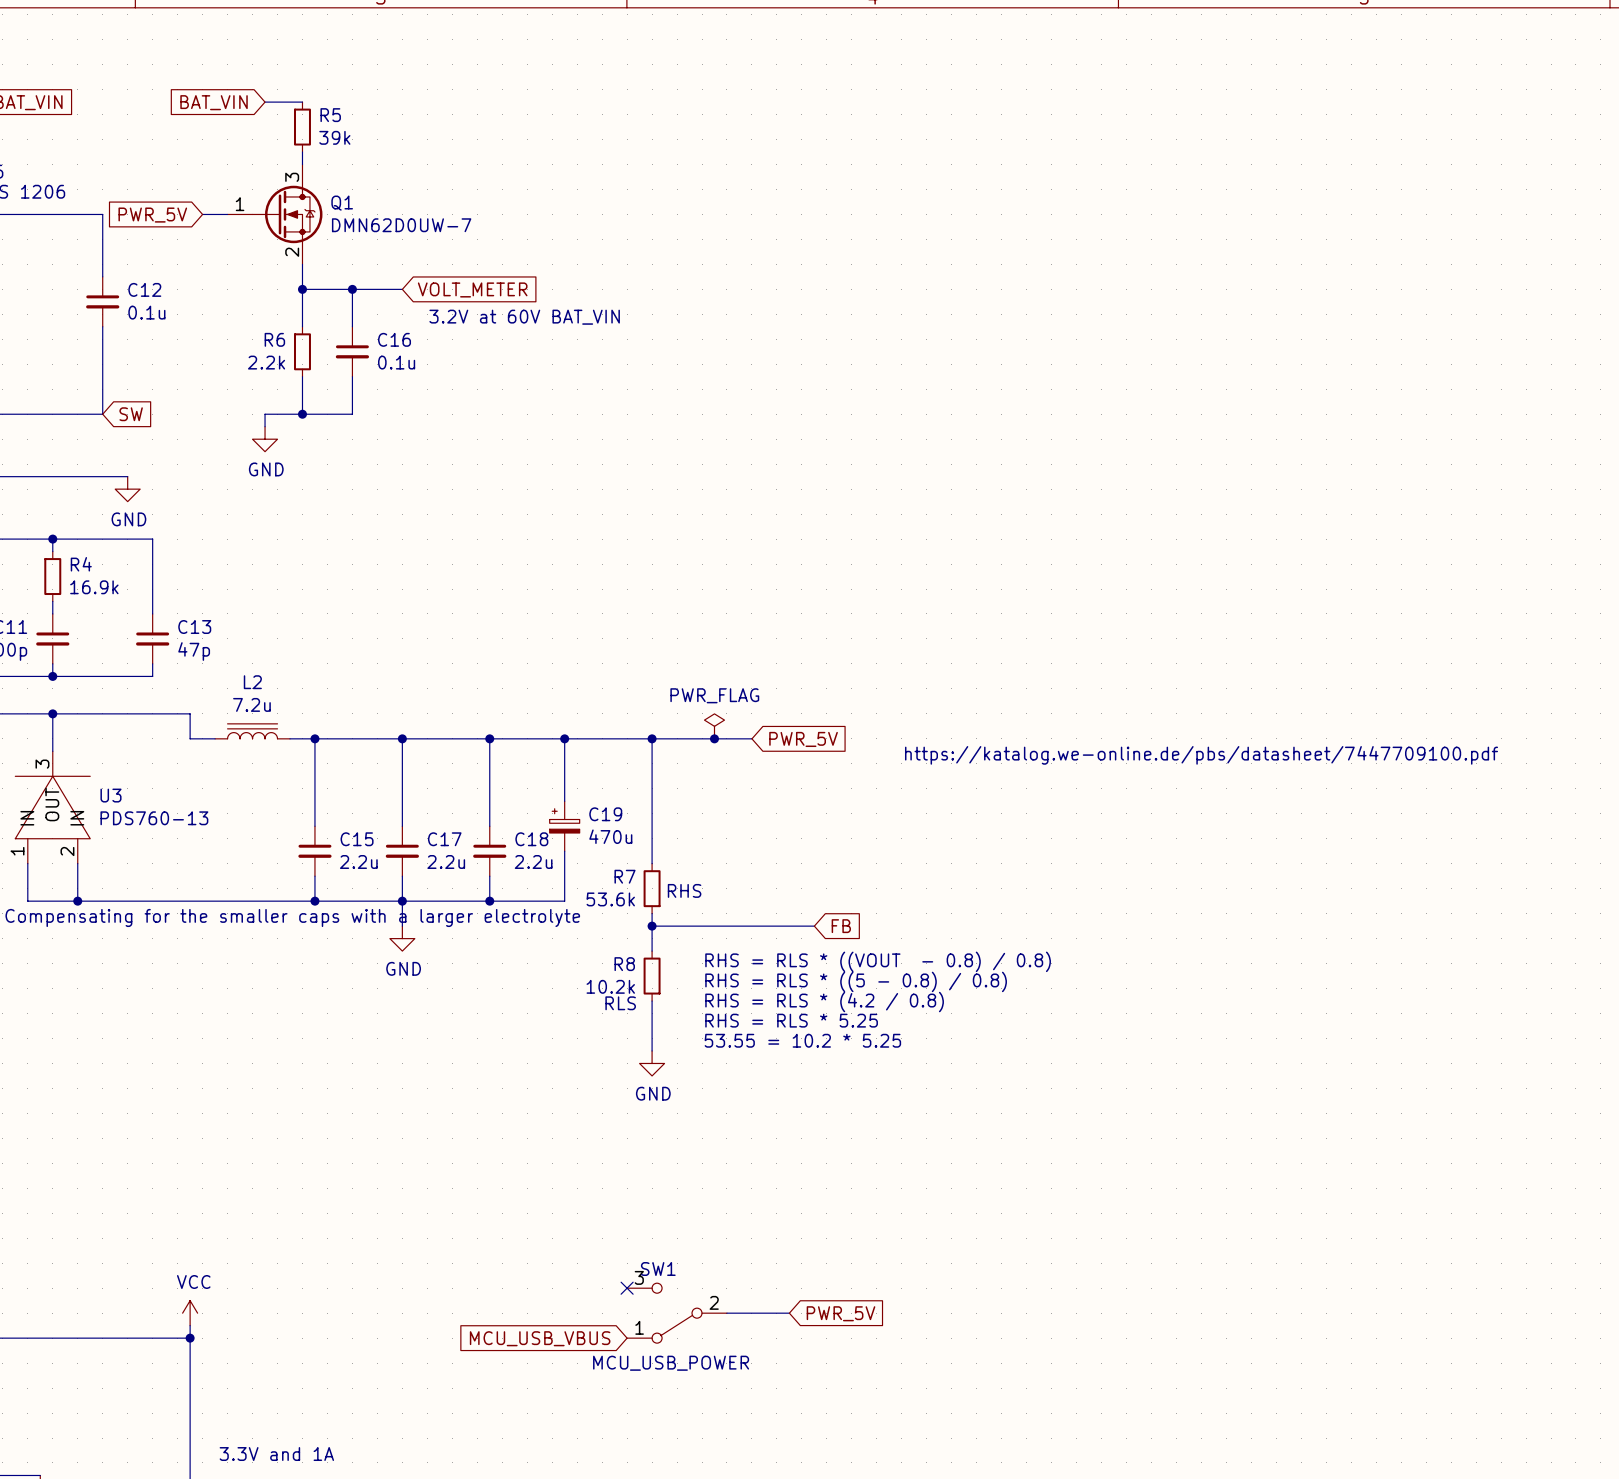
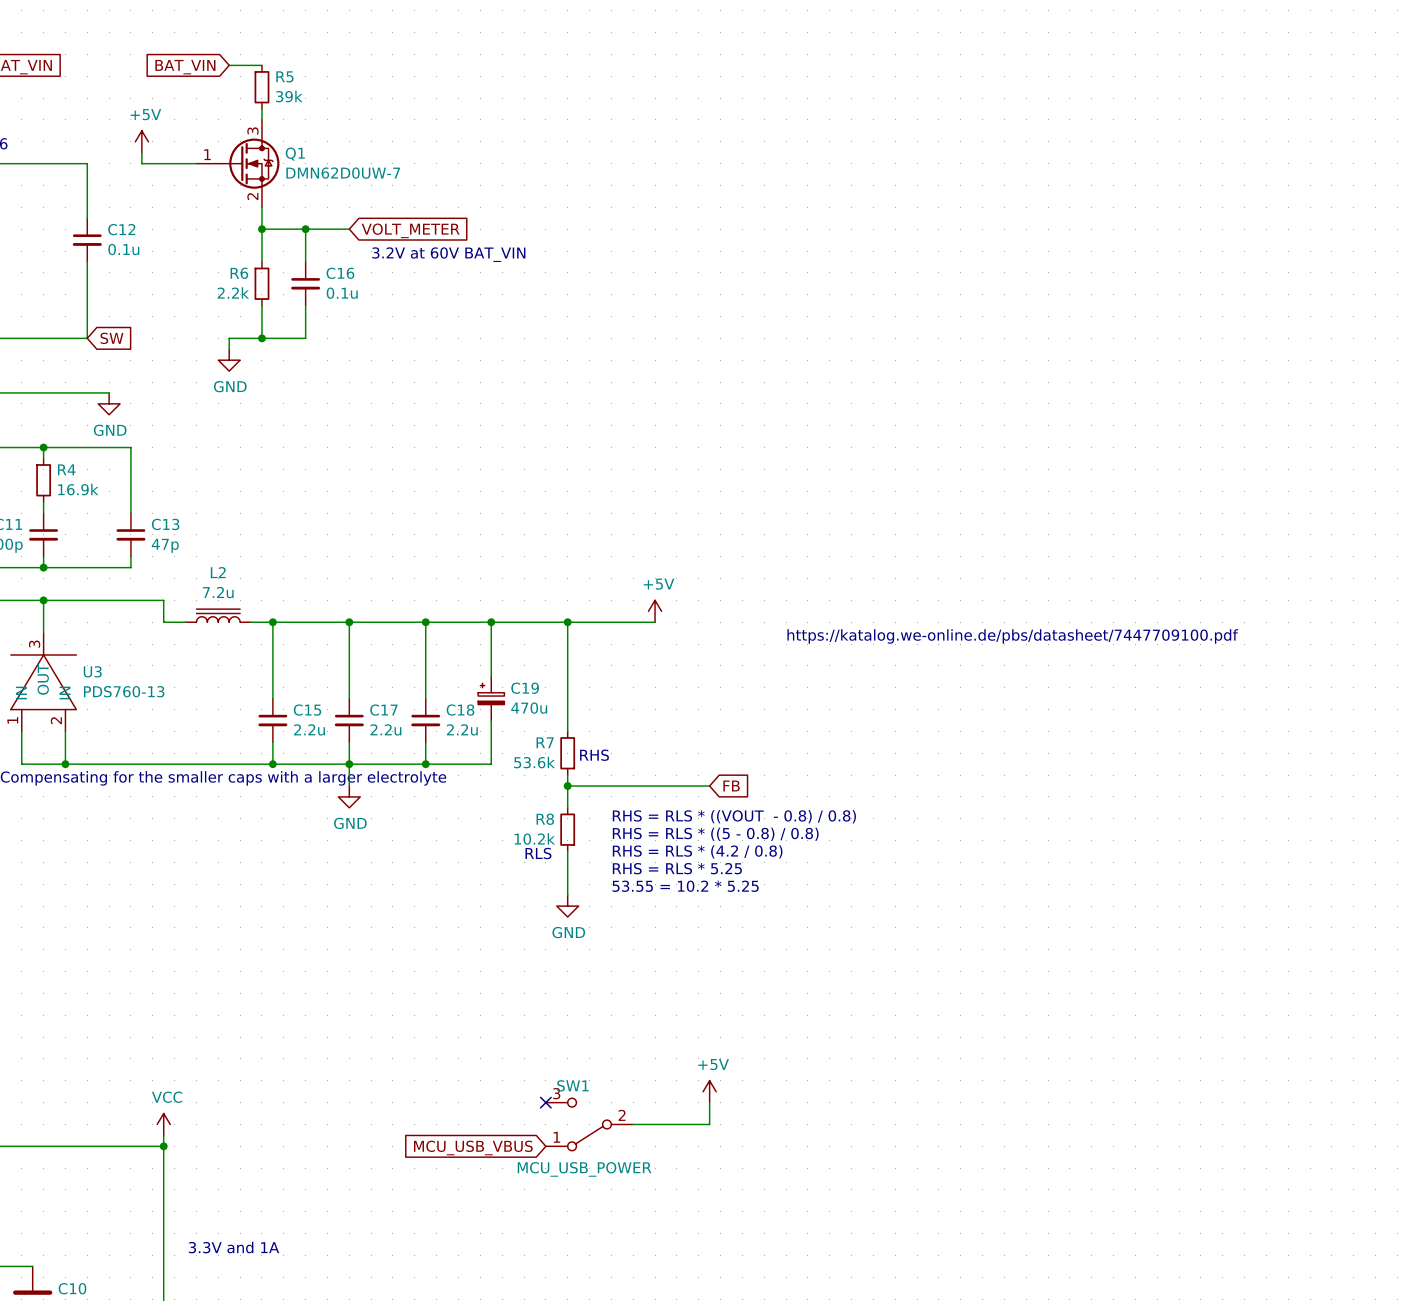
power symbol: none -> +5V (141, 141)
wire: none -> (141, 152) (141, 163) (174, 163)
global label: PWR_5V (152, 215) -> none
power symbol: PWR_FLAG (714, 726) -> none
power symbol: none -> +5V (655, 611)
junction: (714, 738) -> none
global label: PWR_5V (803, 739) -> none
power symbol: none -> +5V (709, 1091)
wire: none -> (709, 1102) (709, 1124) (687, 1124)
global label: PWR_5V (841, 1313) -> none

